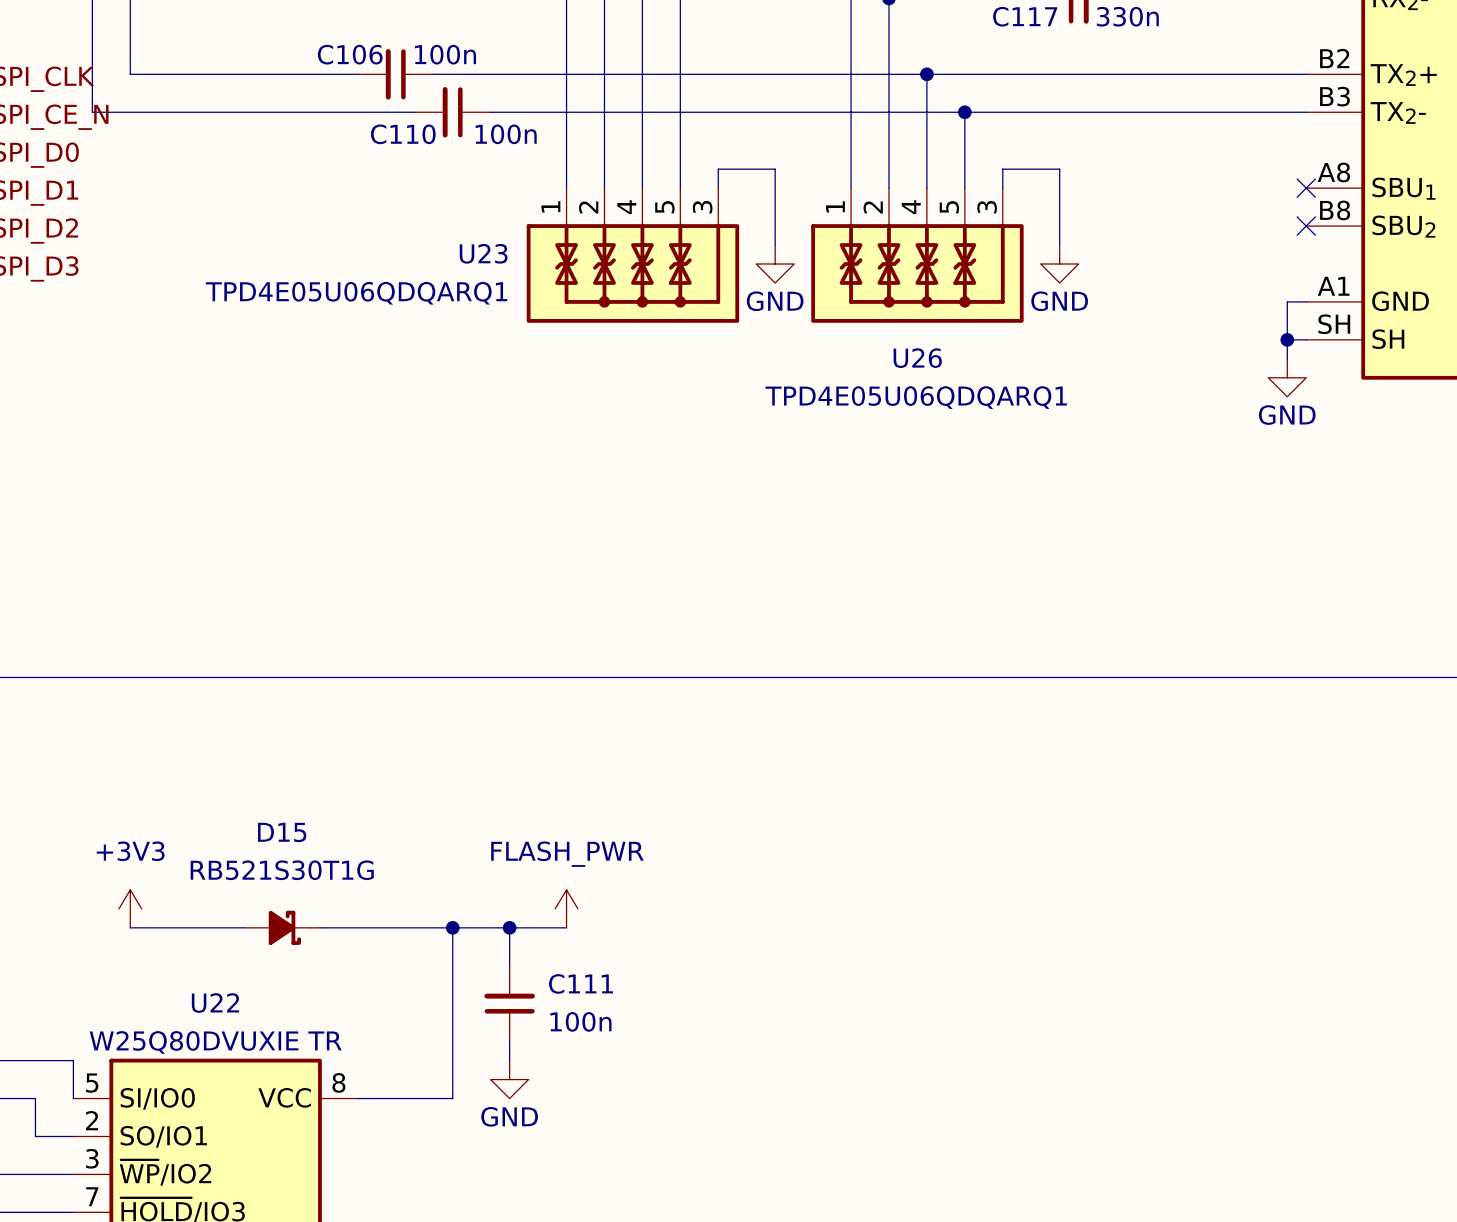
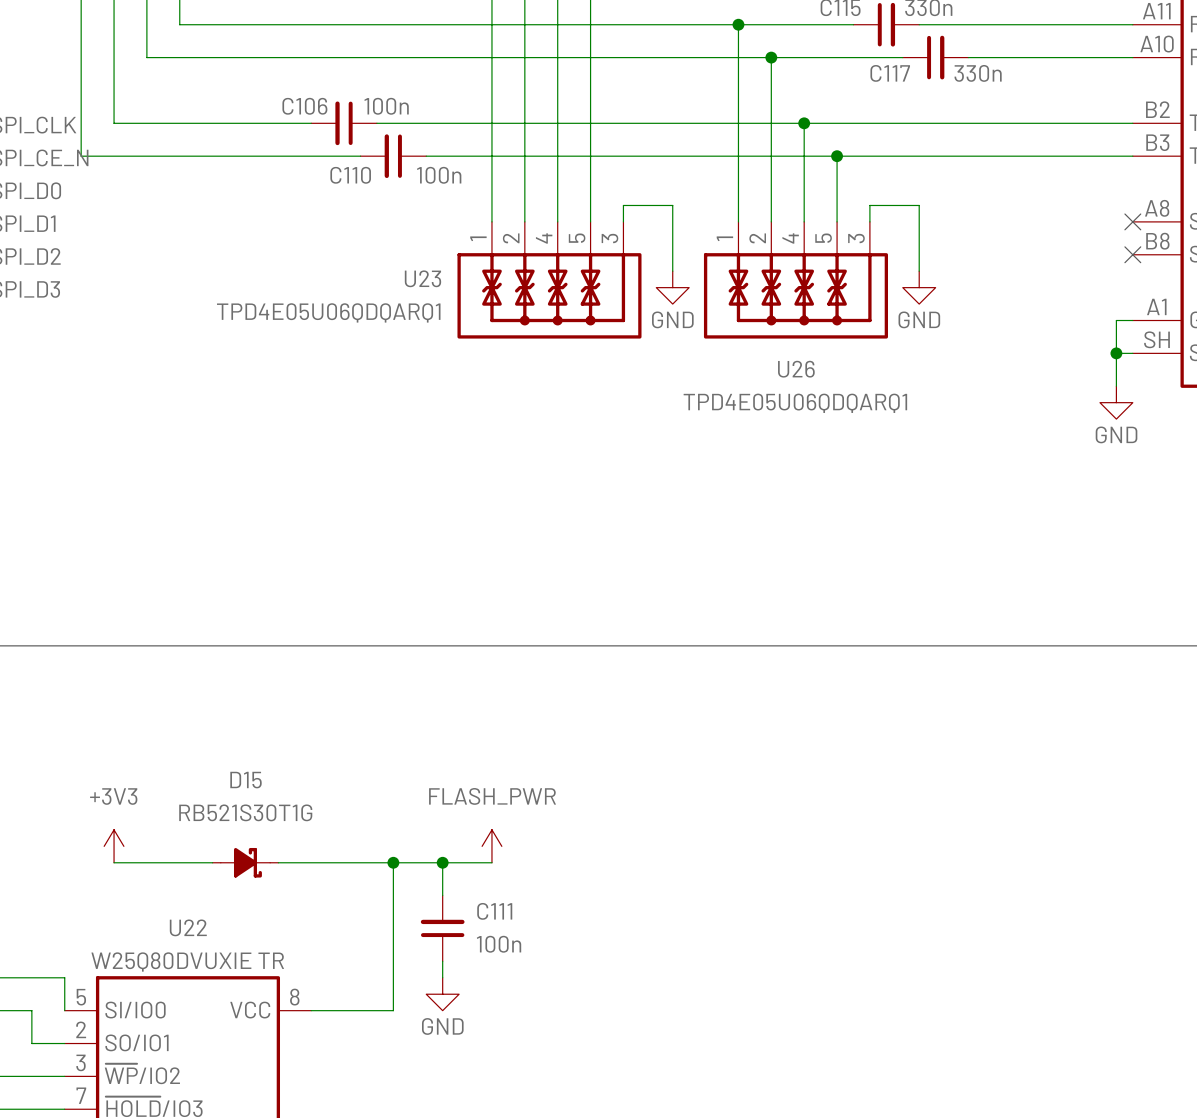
power symbol position: GND (1287, 377) -> GND (1116, 402)

